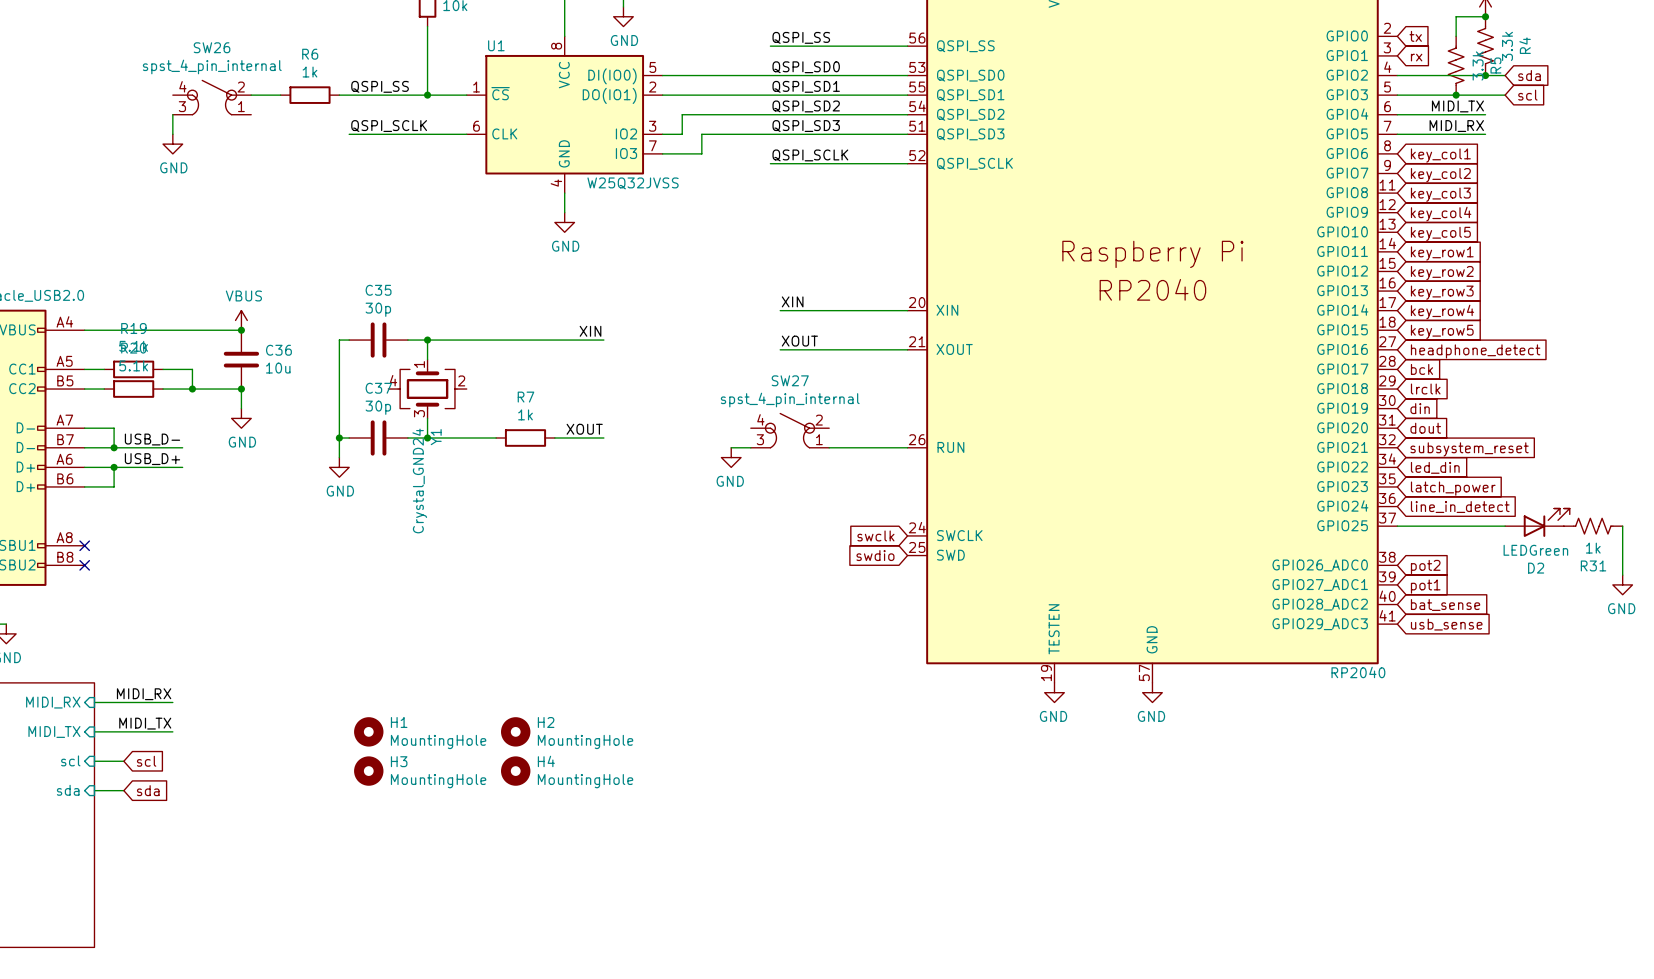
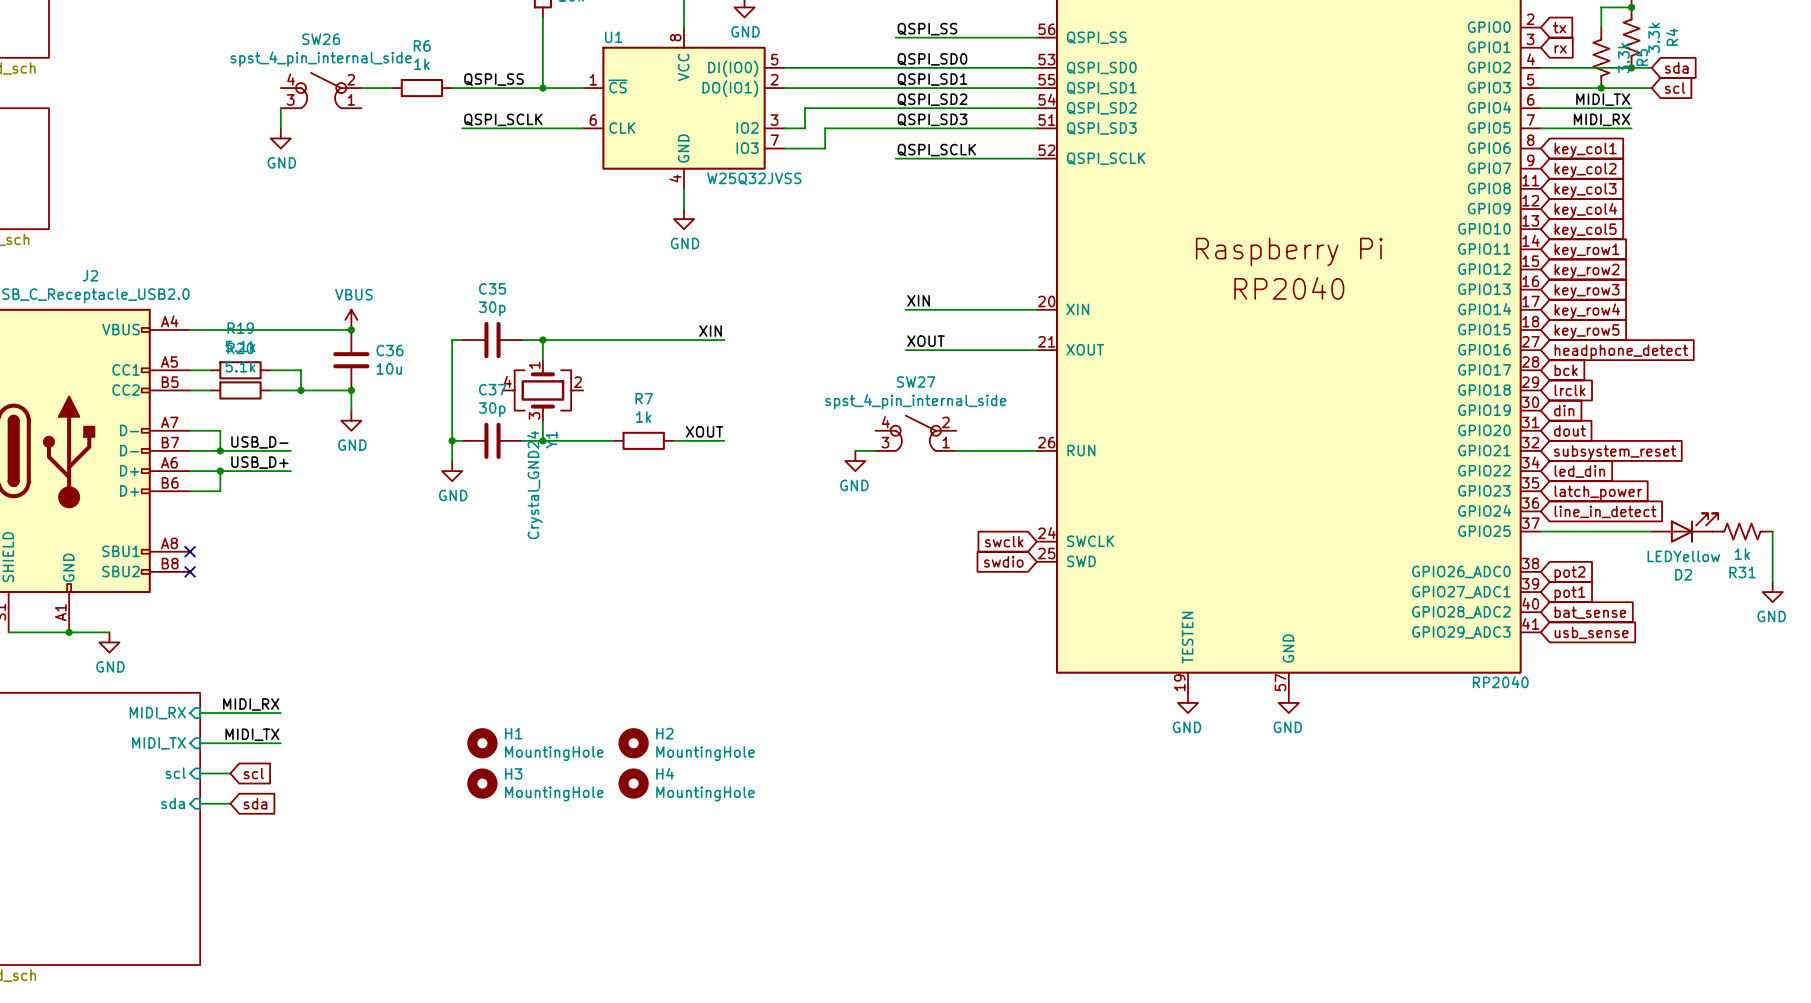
SW26 value: spst_4_pin_internal (212, 66) -> spst_4_pin_internal_side (321, 59)
SW27 value: spst_4_pin_internal (790, 400) -> spst_4_pin_internal_side (915, 401)
D2 value: LEDGreen (1535, 550) -> LEDYellow (1683, 556)

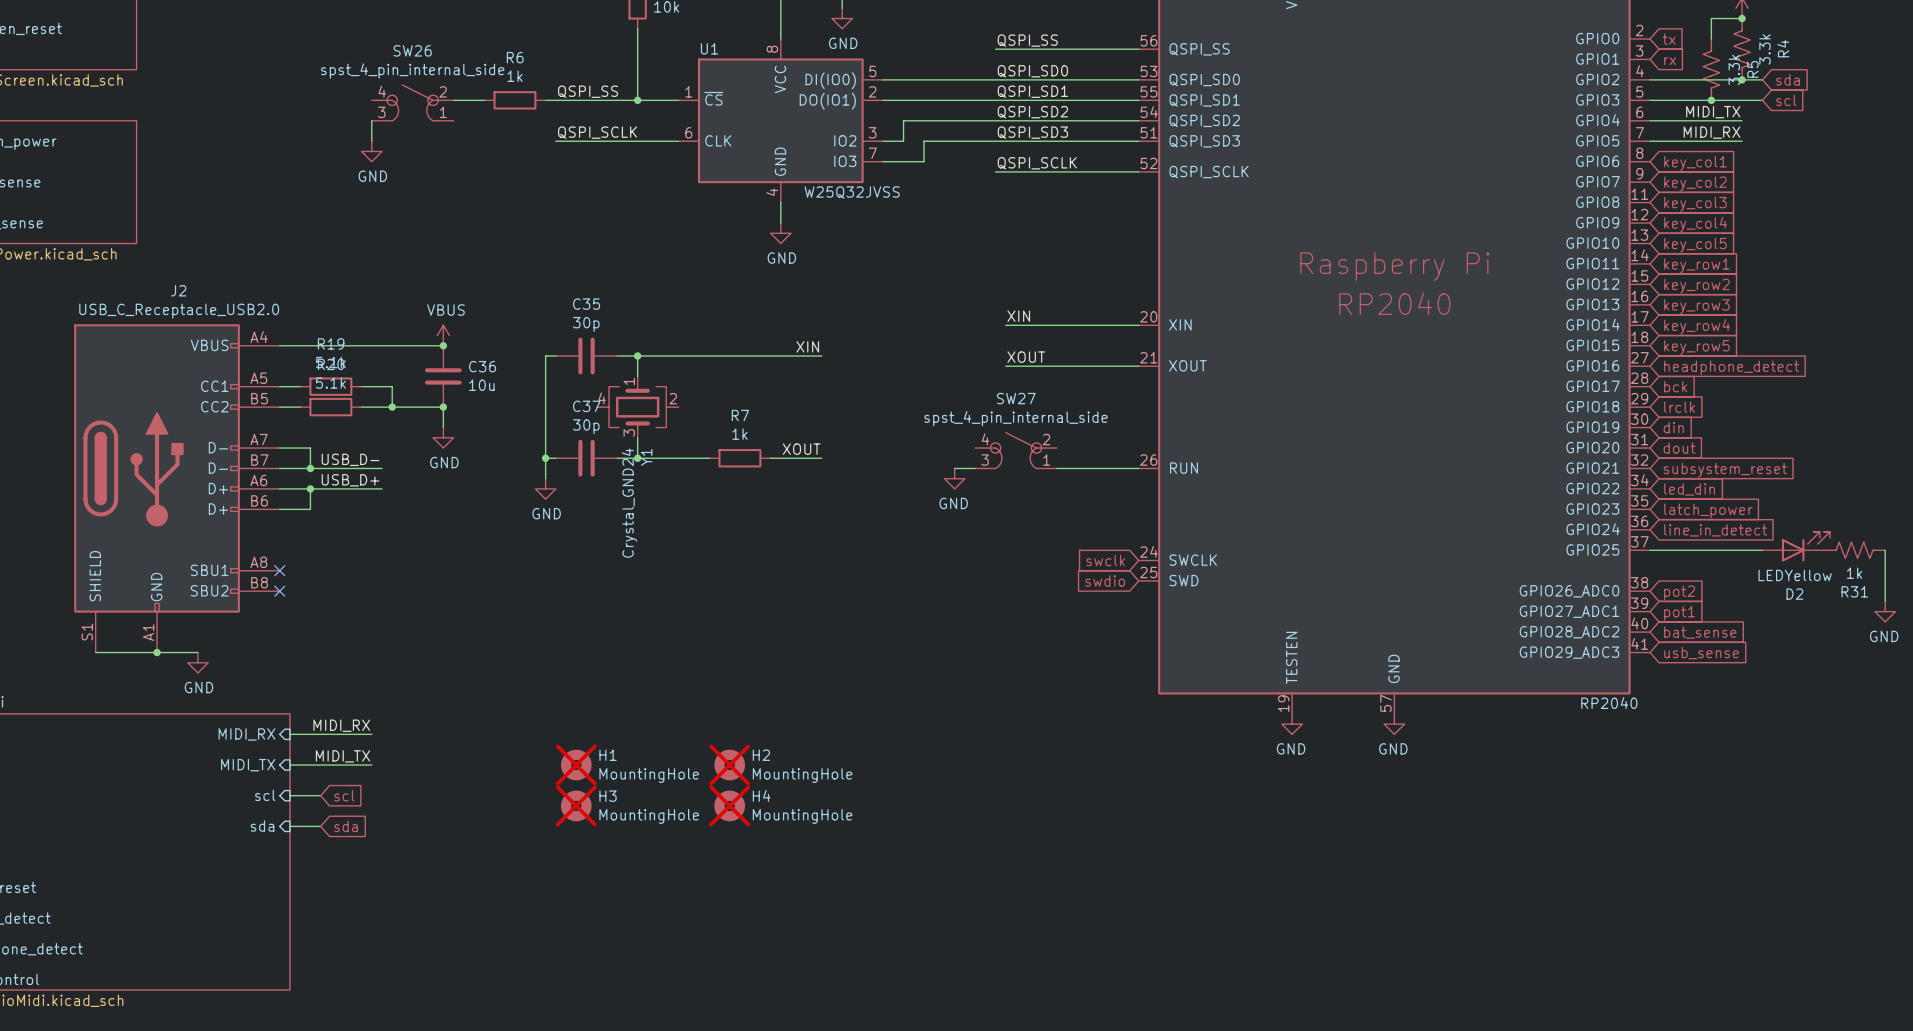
H1 do-not-place cross: none -> (576, 765)
H2 do-not-place cross: none -> (729, 765)
H3 do-not-place cross: none -> (576, 805)
H4 do-not-place cross: none -> (729, 805)

